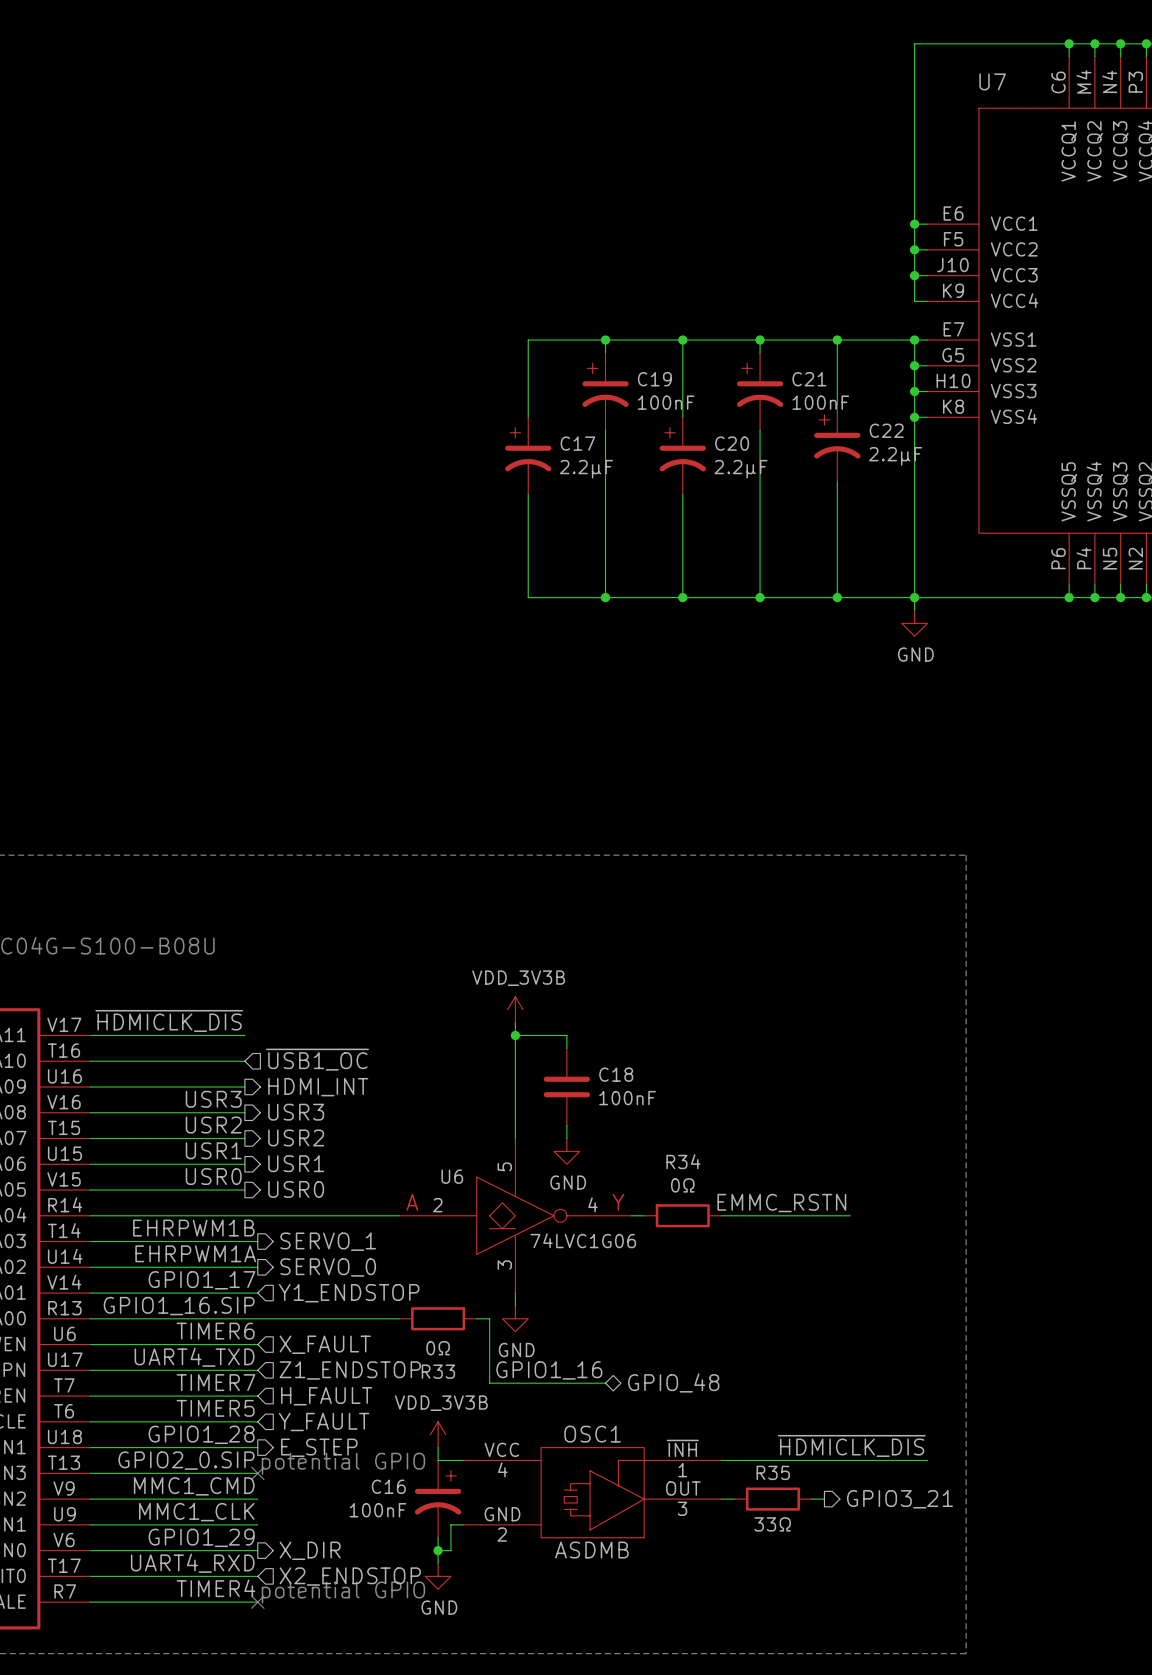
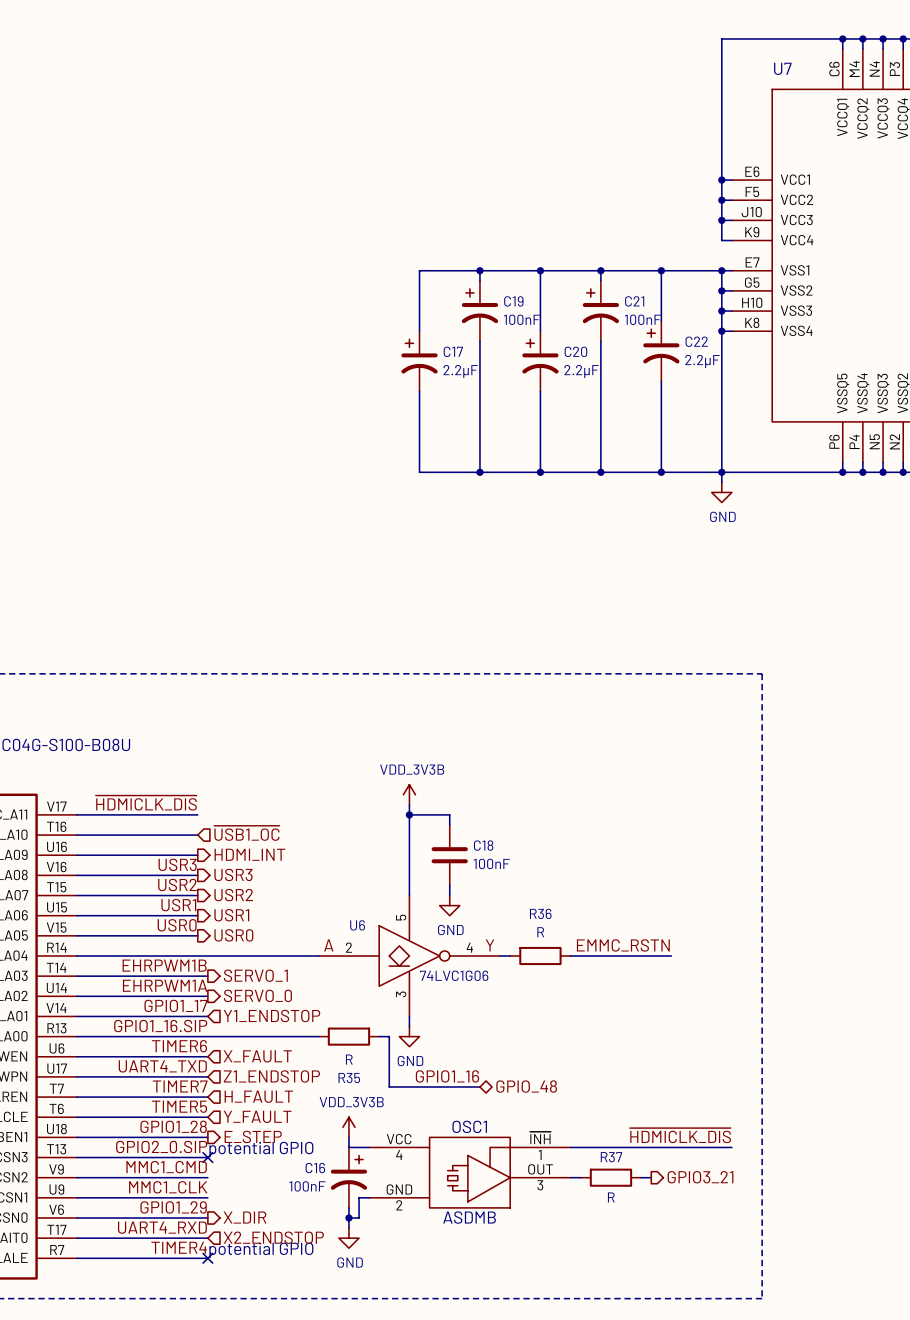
R34 name: R34 (683, 1161) -> R36 (540, 913)
R34 value: 0Ω (682, 1185) -> R (540, 932)
R33 value: 0Ω (438, 1348) -> R (349, 1059)
R33 name: R33 (438, 1371) -> R35 (349, 1078)
R35 name: R35 (773, 1472) -> R37 (611, 1157)
R35 value: 33Ω (772, 1524) -> R (611, 1197)

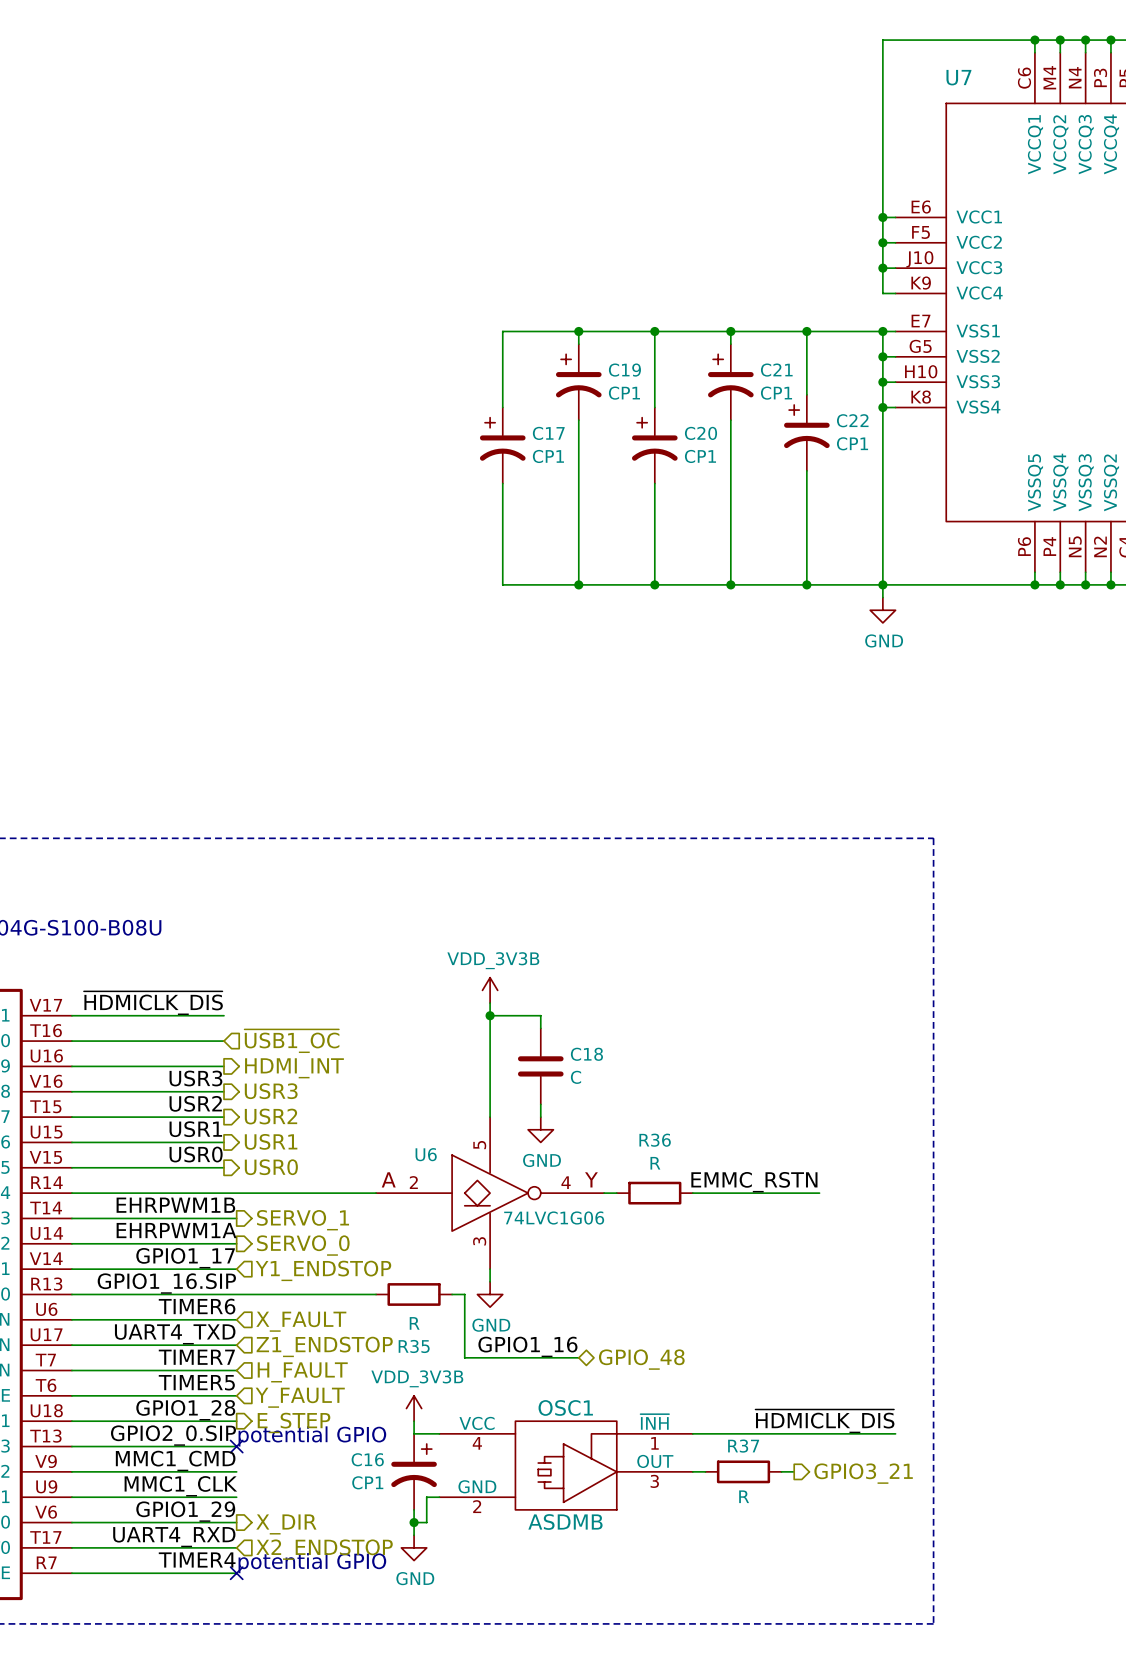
C19 value: 100nF (522, 319) -> CP1 (624, 393)
C21 value: 100nF (642, 319) -> CP1 (776, 393)
C22 value: 2.2μF (702, 361) -> CP1 (852, 443)
C17 value: 2.2μF (460, 371) -> CP1 (548, 456)
C20 value: 2.2μF (581, 371) -> CP1 (700, 456)
C18 value: 100nF (491, 863) -> C (576, 1077)
C16 value: 100nF (307, 1186) -> CP1 (367, 1482)

